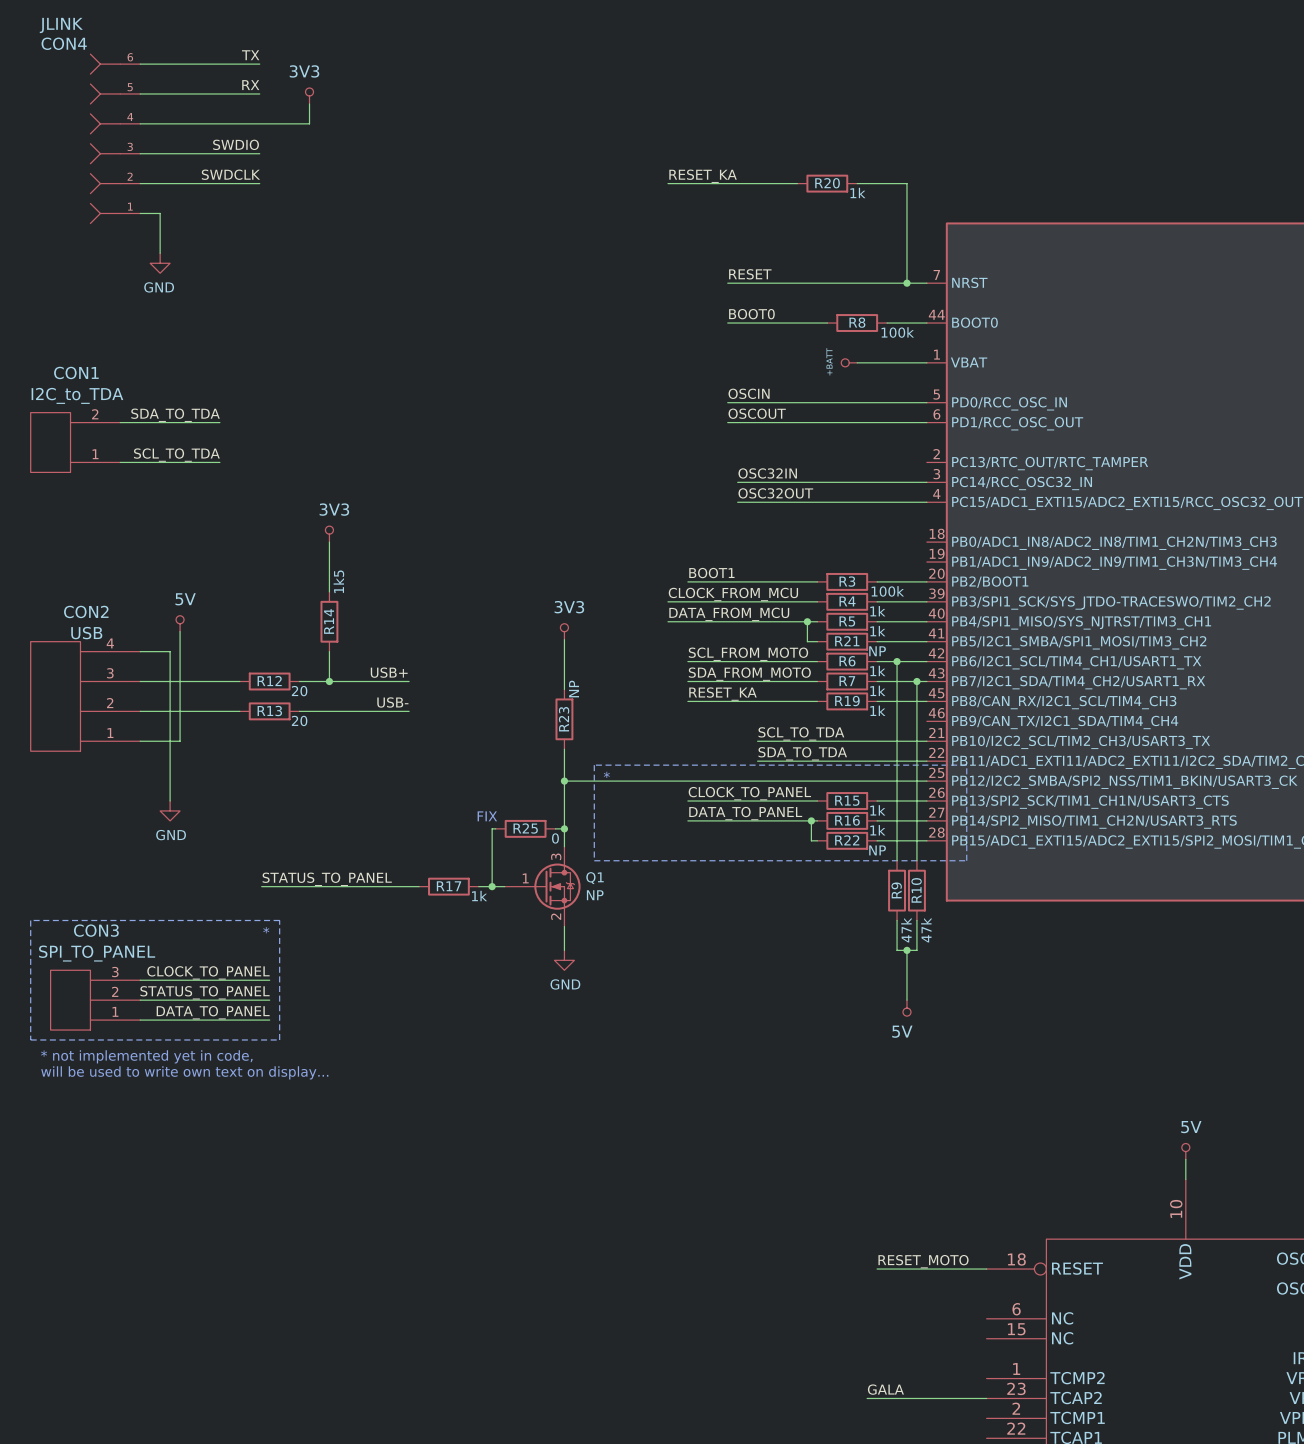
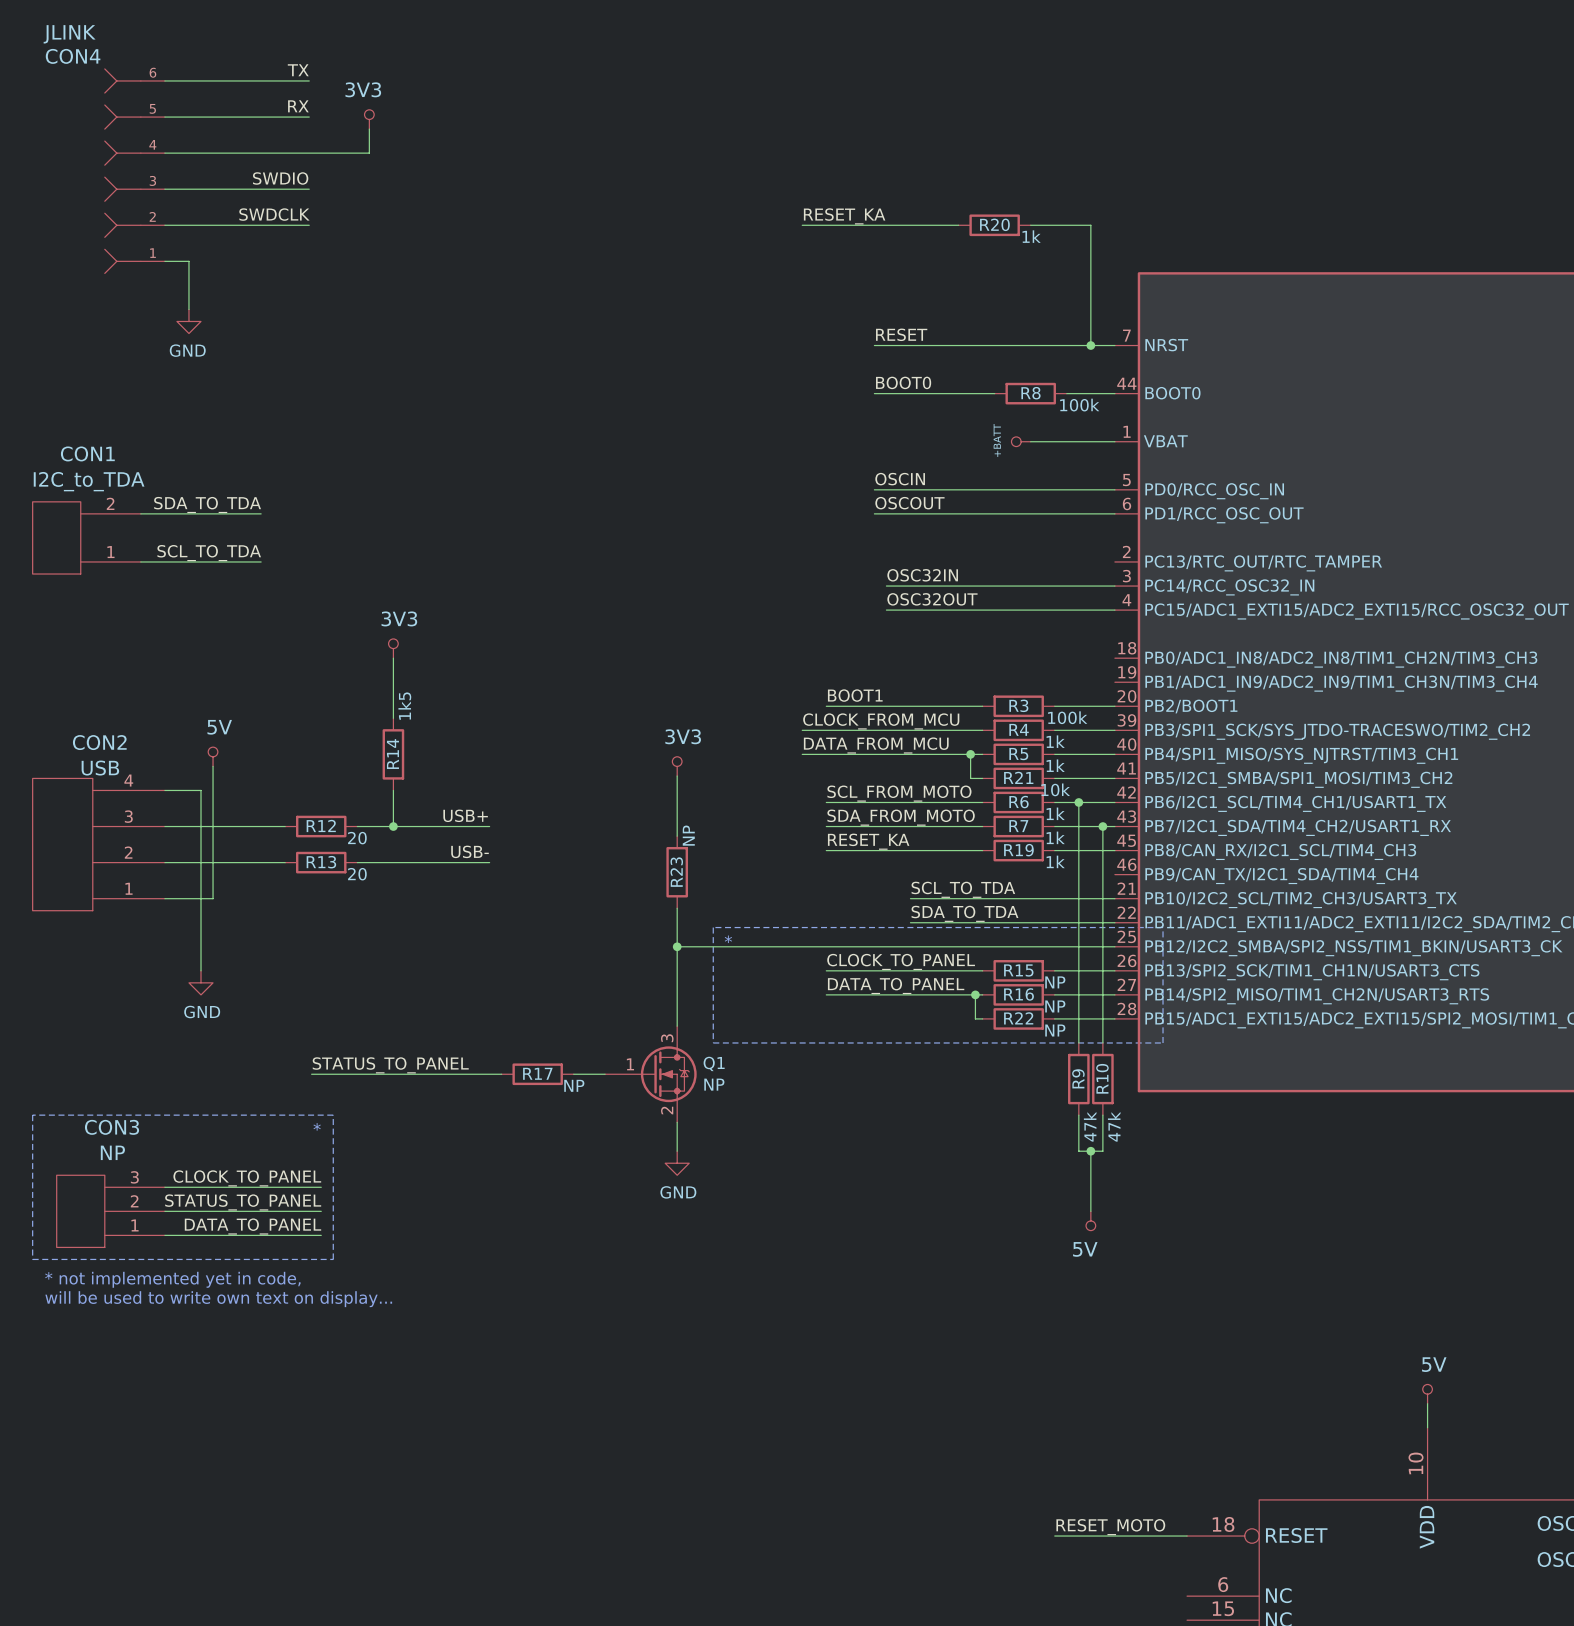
R21 value: NP (877, 651) -> 10k (1055, 789)
R15 value: 1k (877, 810) -> NP (1055, 982)
text: FIX (487, 816) -> none
wire: (495, 828) (492, 828) (492, 886) -> none
R25: 0 (525, 828) -> none
wire: (555, 828) (564, 828) -> none
junction: (564, 828) -> none
R16 value: 1k (877, 830) -> NP (1055, 1006)
junction: (492, 886) -> none
R17 value: 1k (479, 896) -> NP (574, 1085)
CON3 value: SPI_TO_PANEL (97, 953) -> NP (112, 1152)

